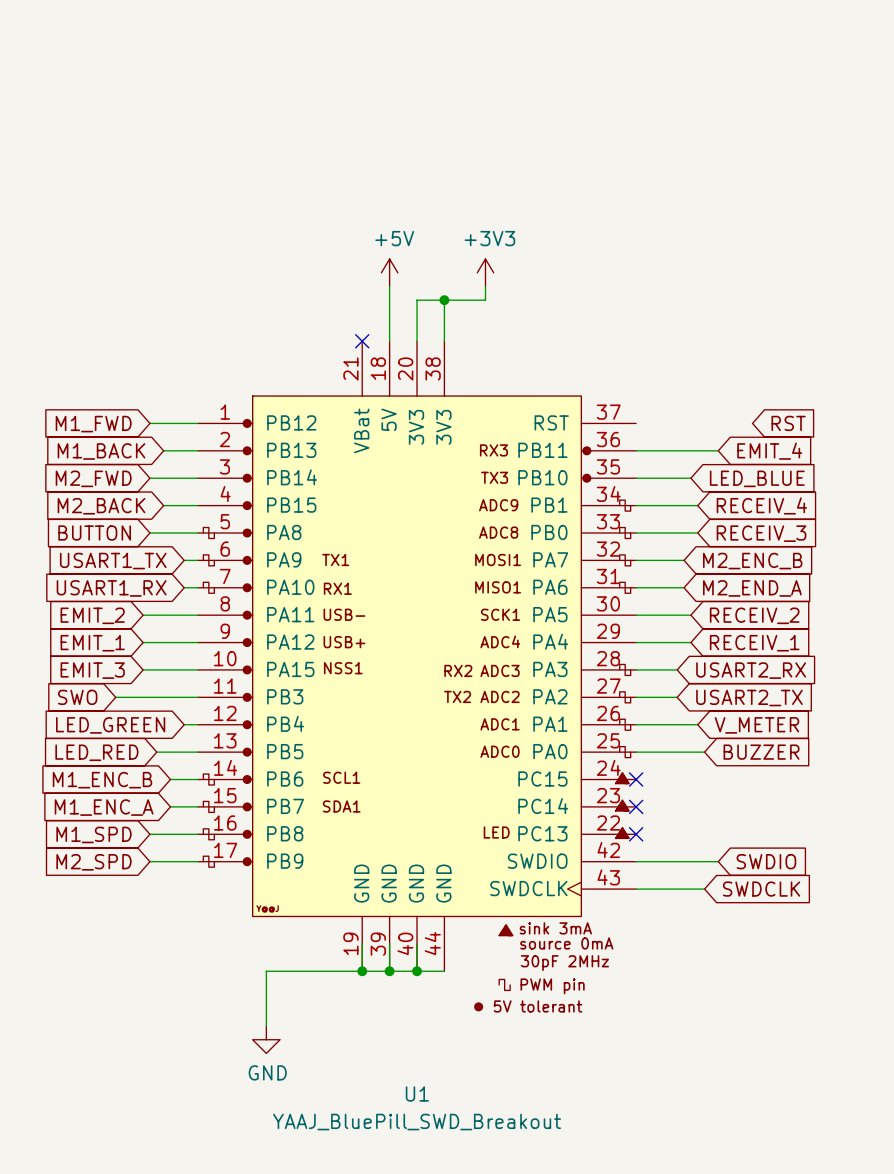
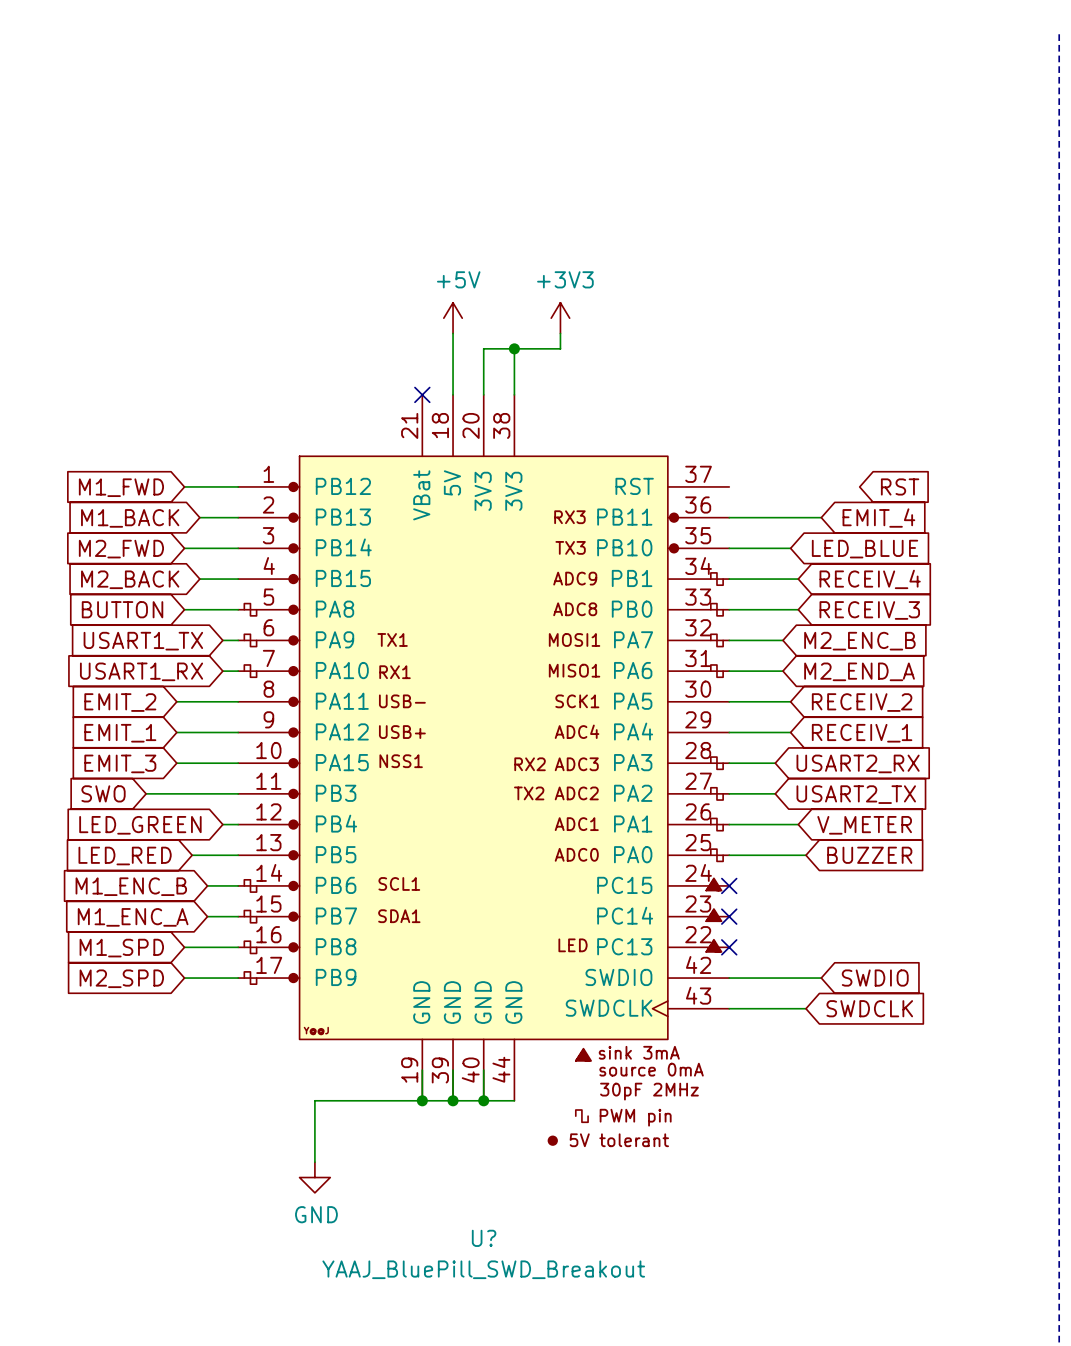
U1 name: U1 (417, 1094) -> U? (484, 1238)

